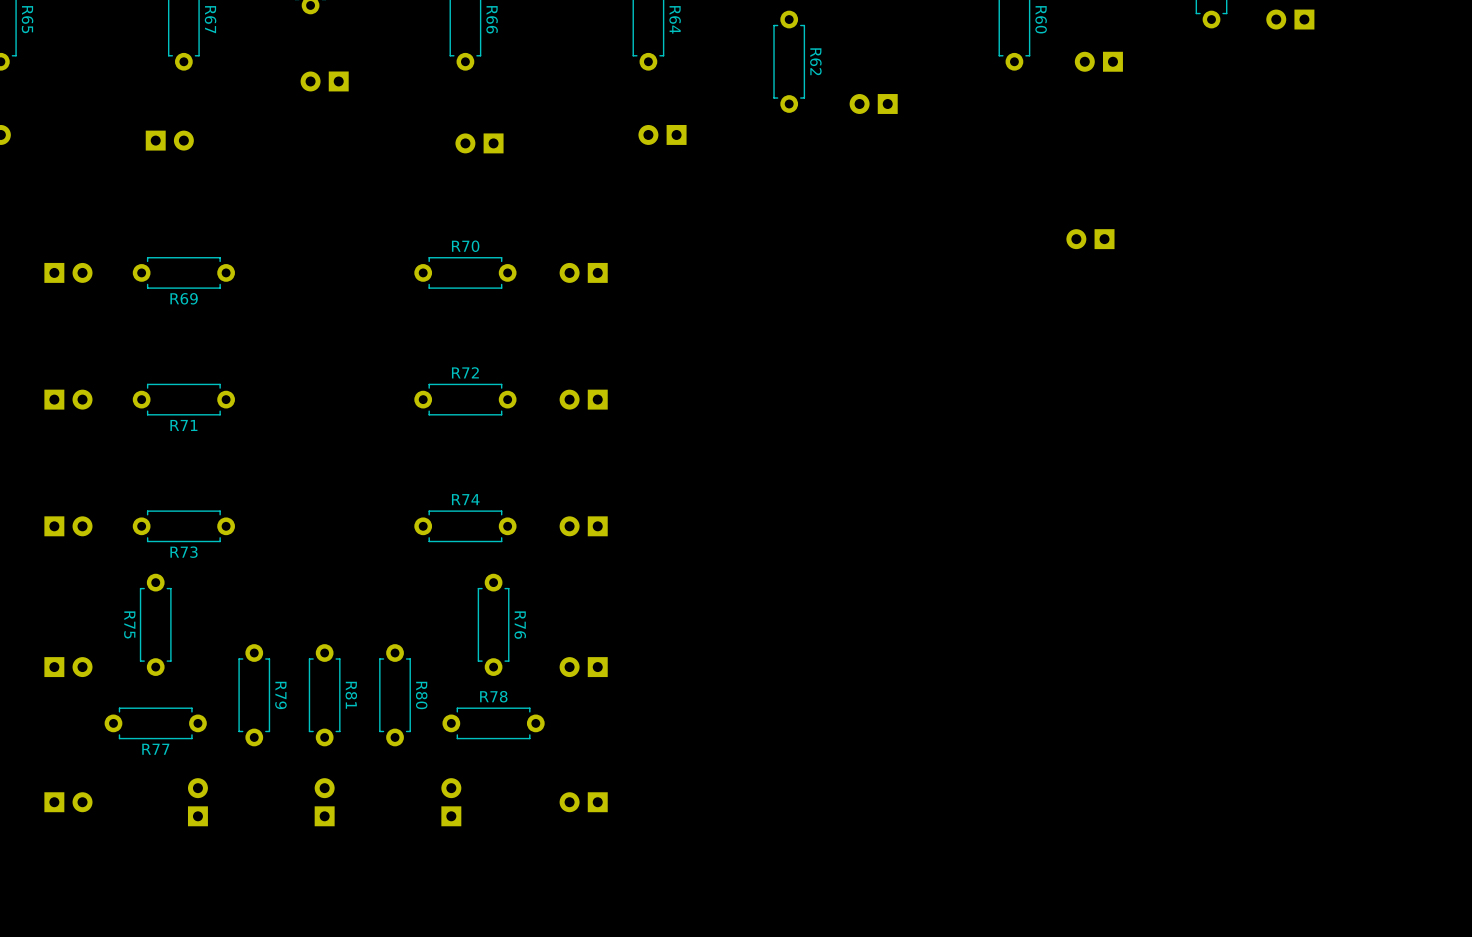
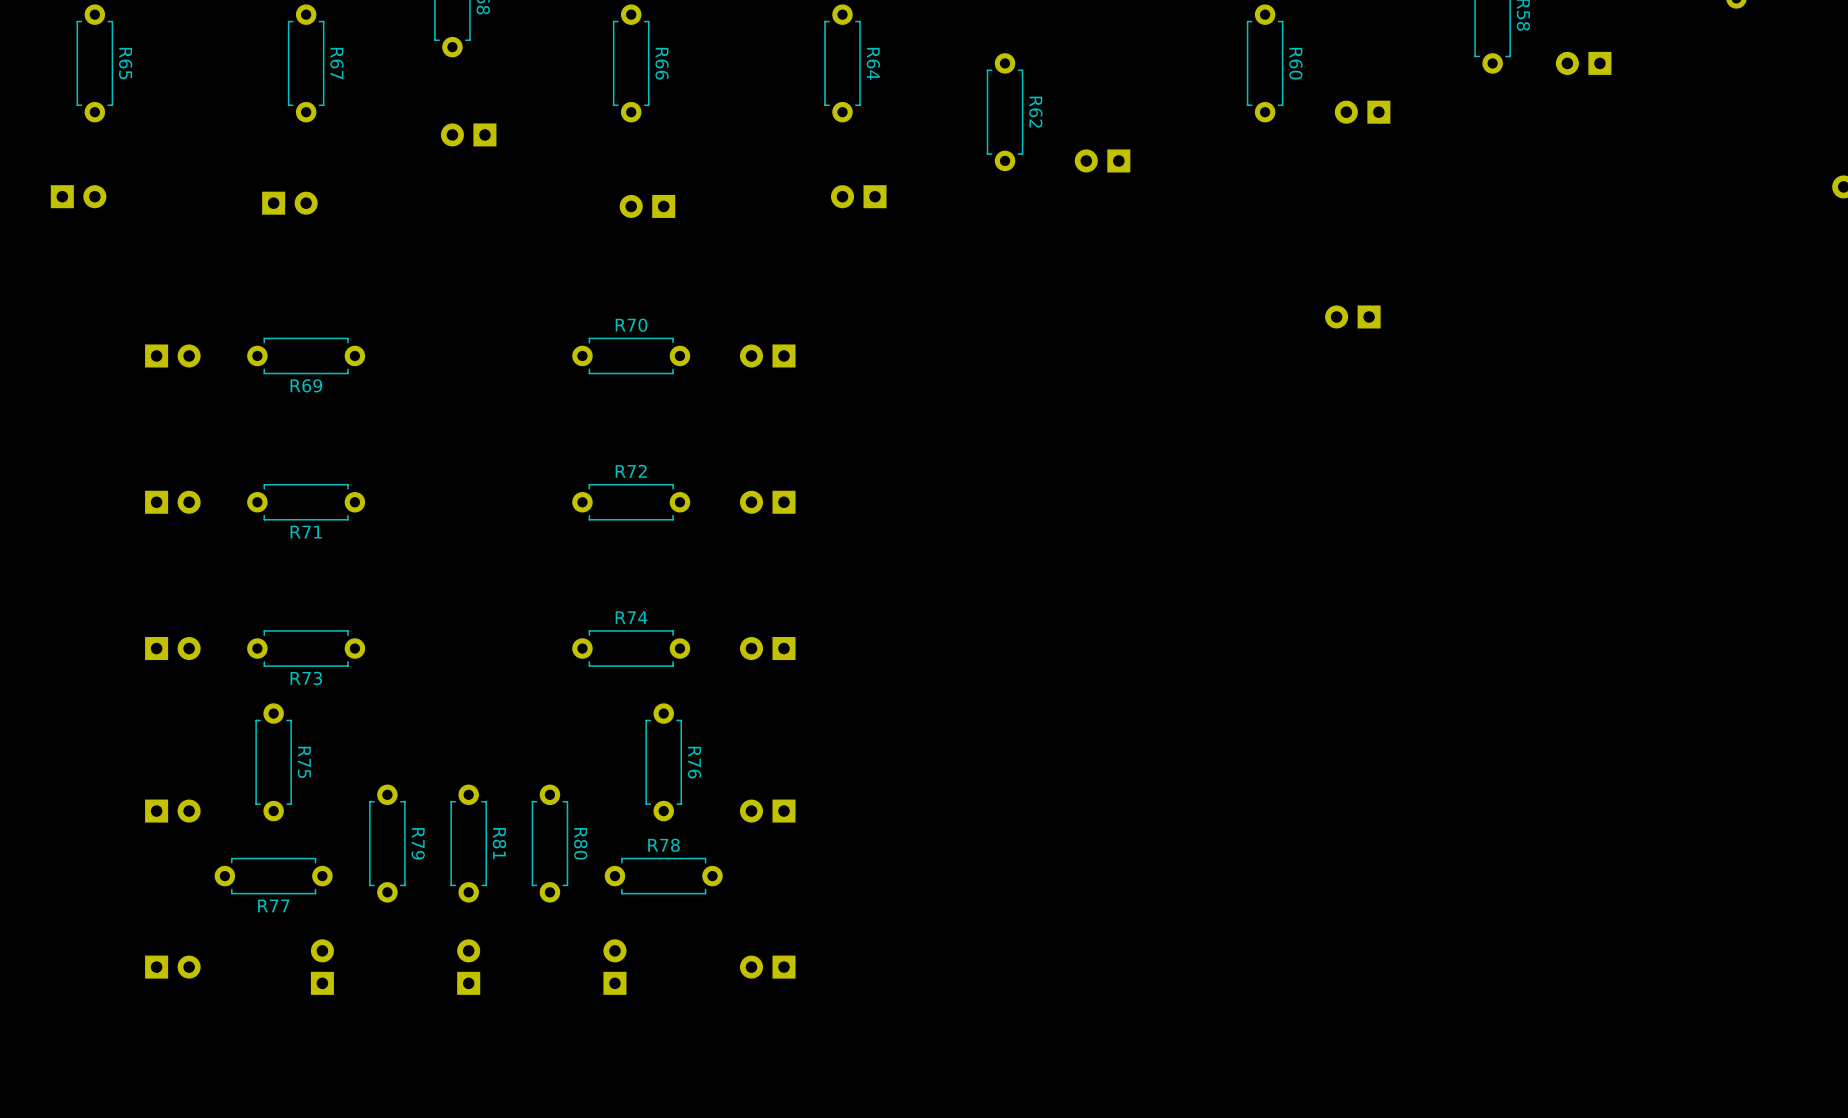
R75 name position: R75 (129, 624) -> R75 (304, 762)

